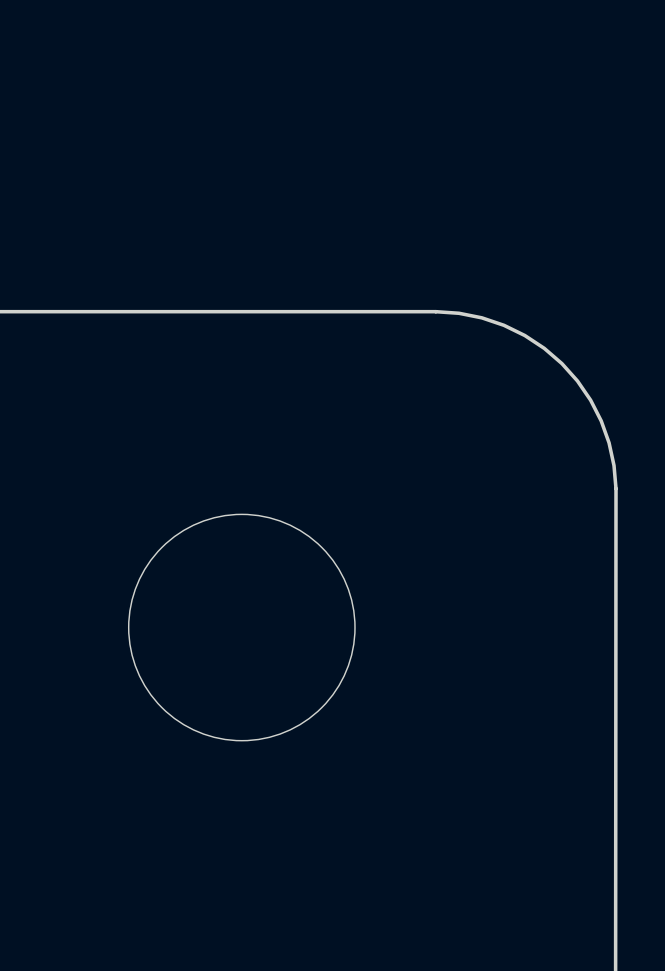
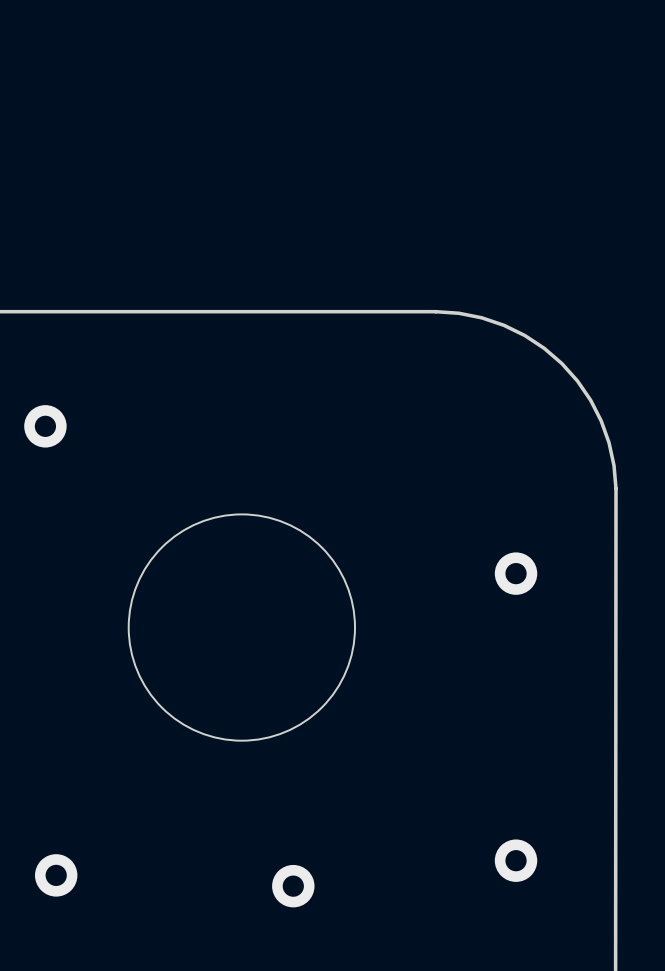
via: none -> (45, 426)
via: none -> (516, 573)
via: none -> (516, 860)
via: none -> (56, 875)
via: none -> (293, 886)

